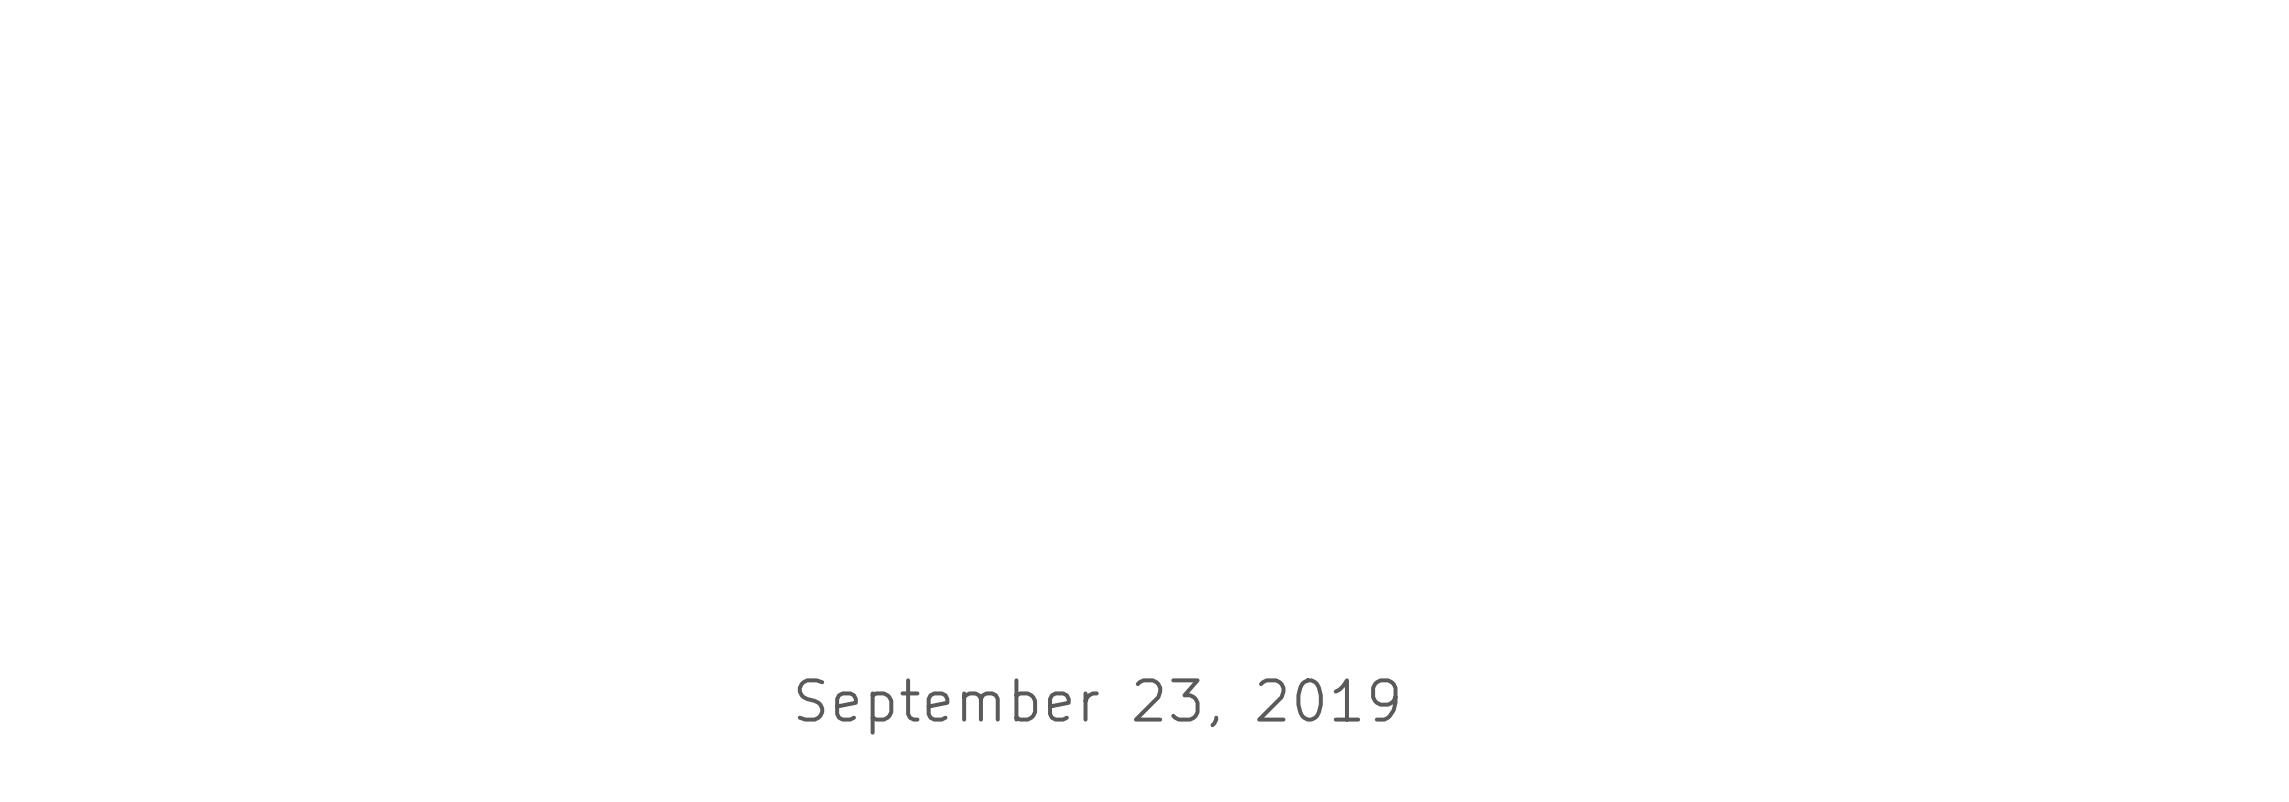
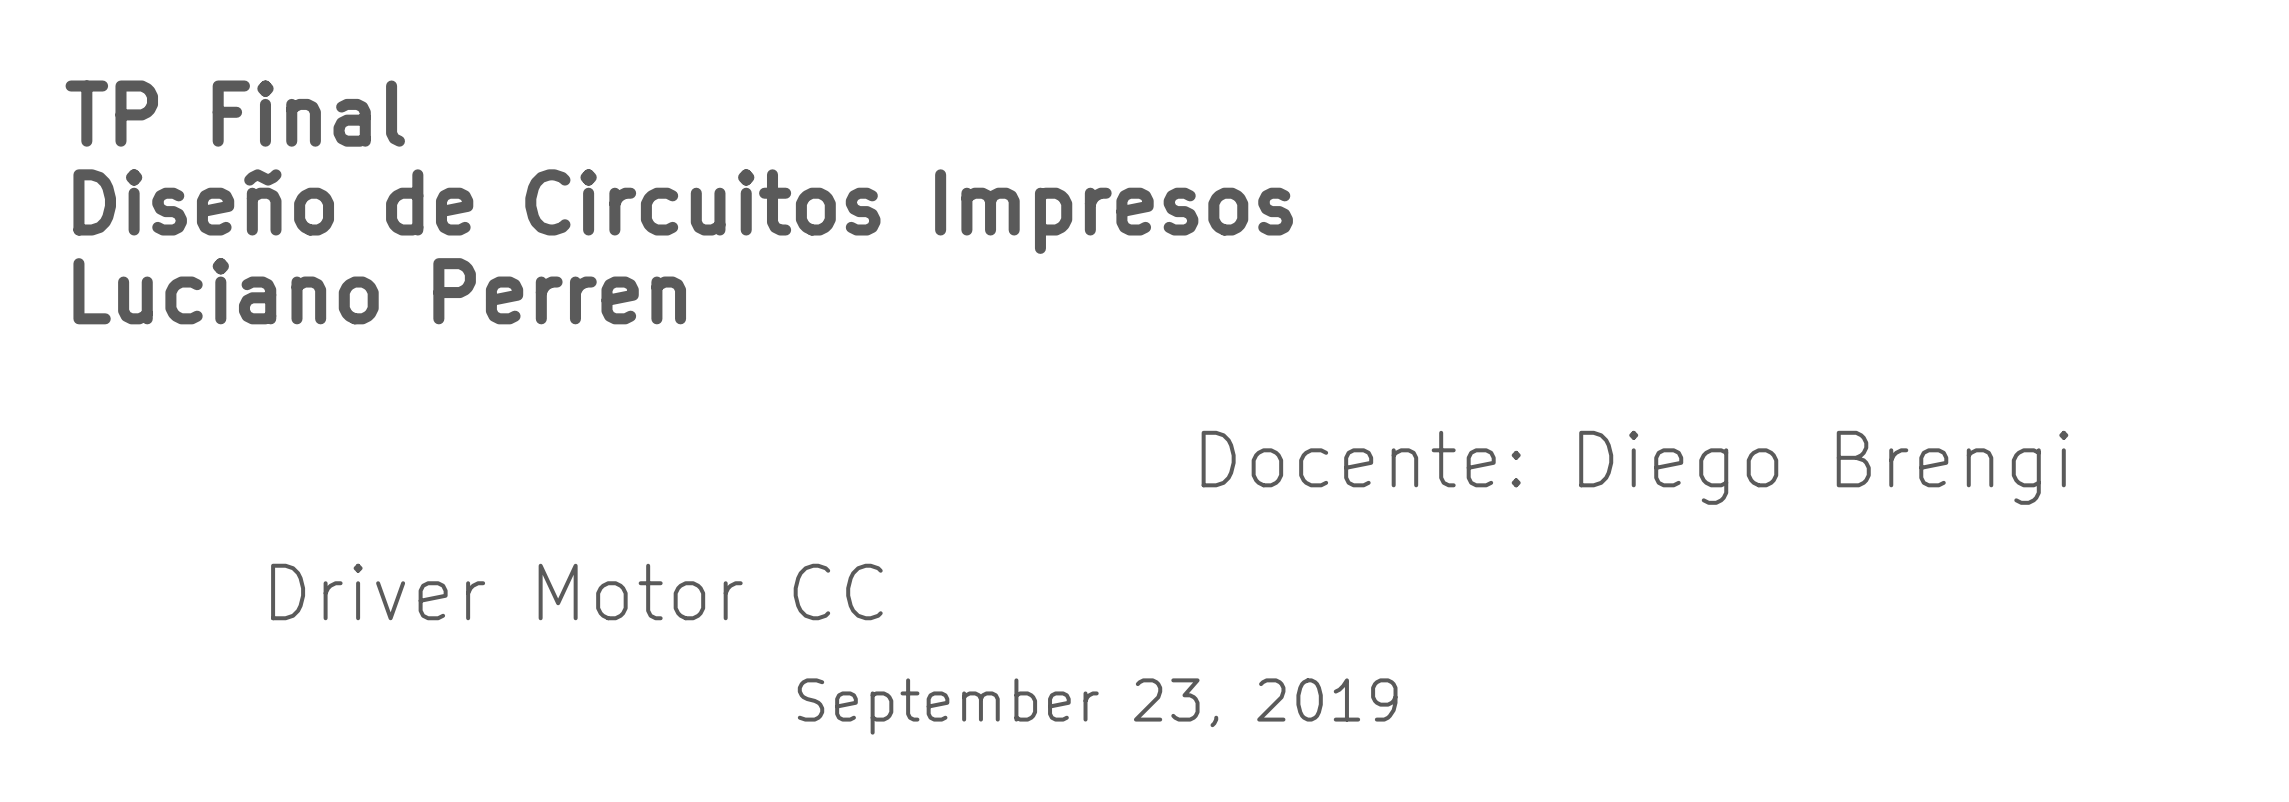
text: none -> TP Final (235, 113)
text: none -> Diseño de Circuitos Impresos (683, 211)
text: none -> Luciano Perren (379, 291)
text: none -> Docente: Diego Brengi (1634, 467)
text: none -> Driver Motor CC (576, 592)

